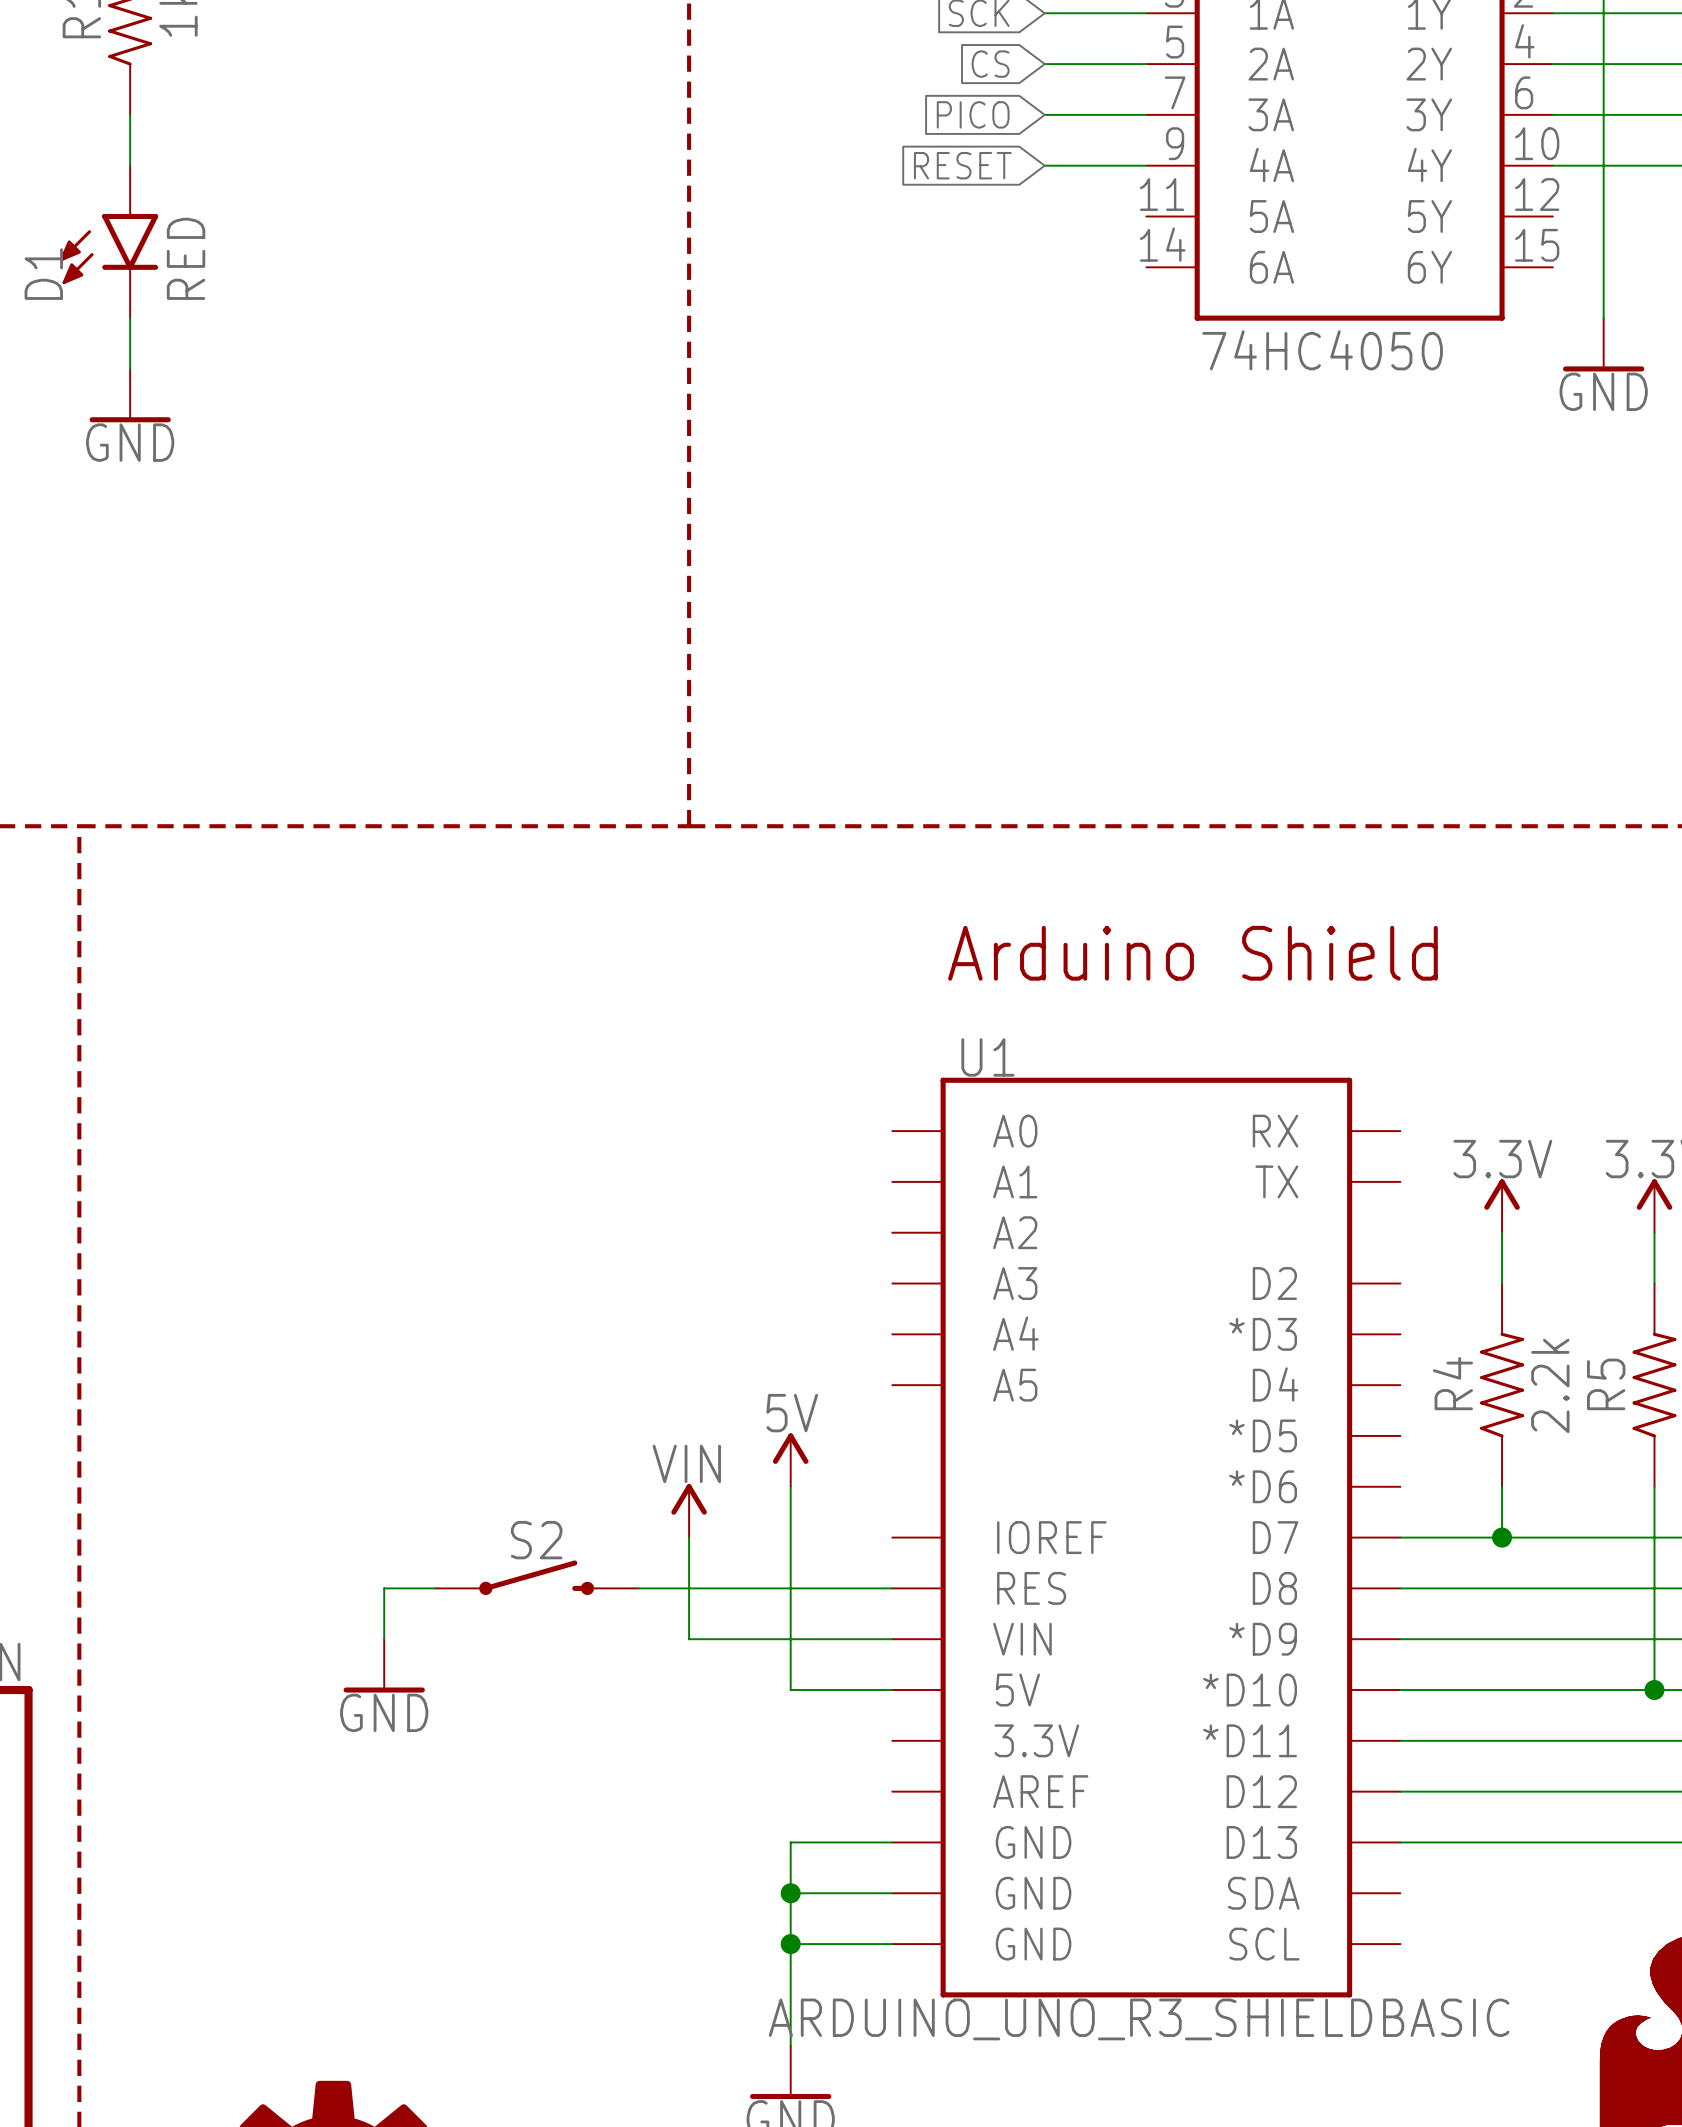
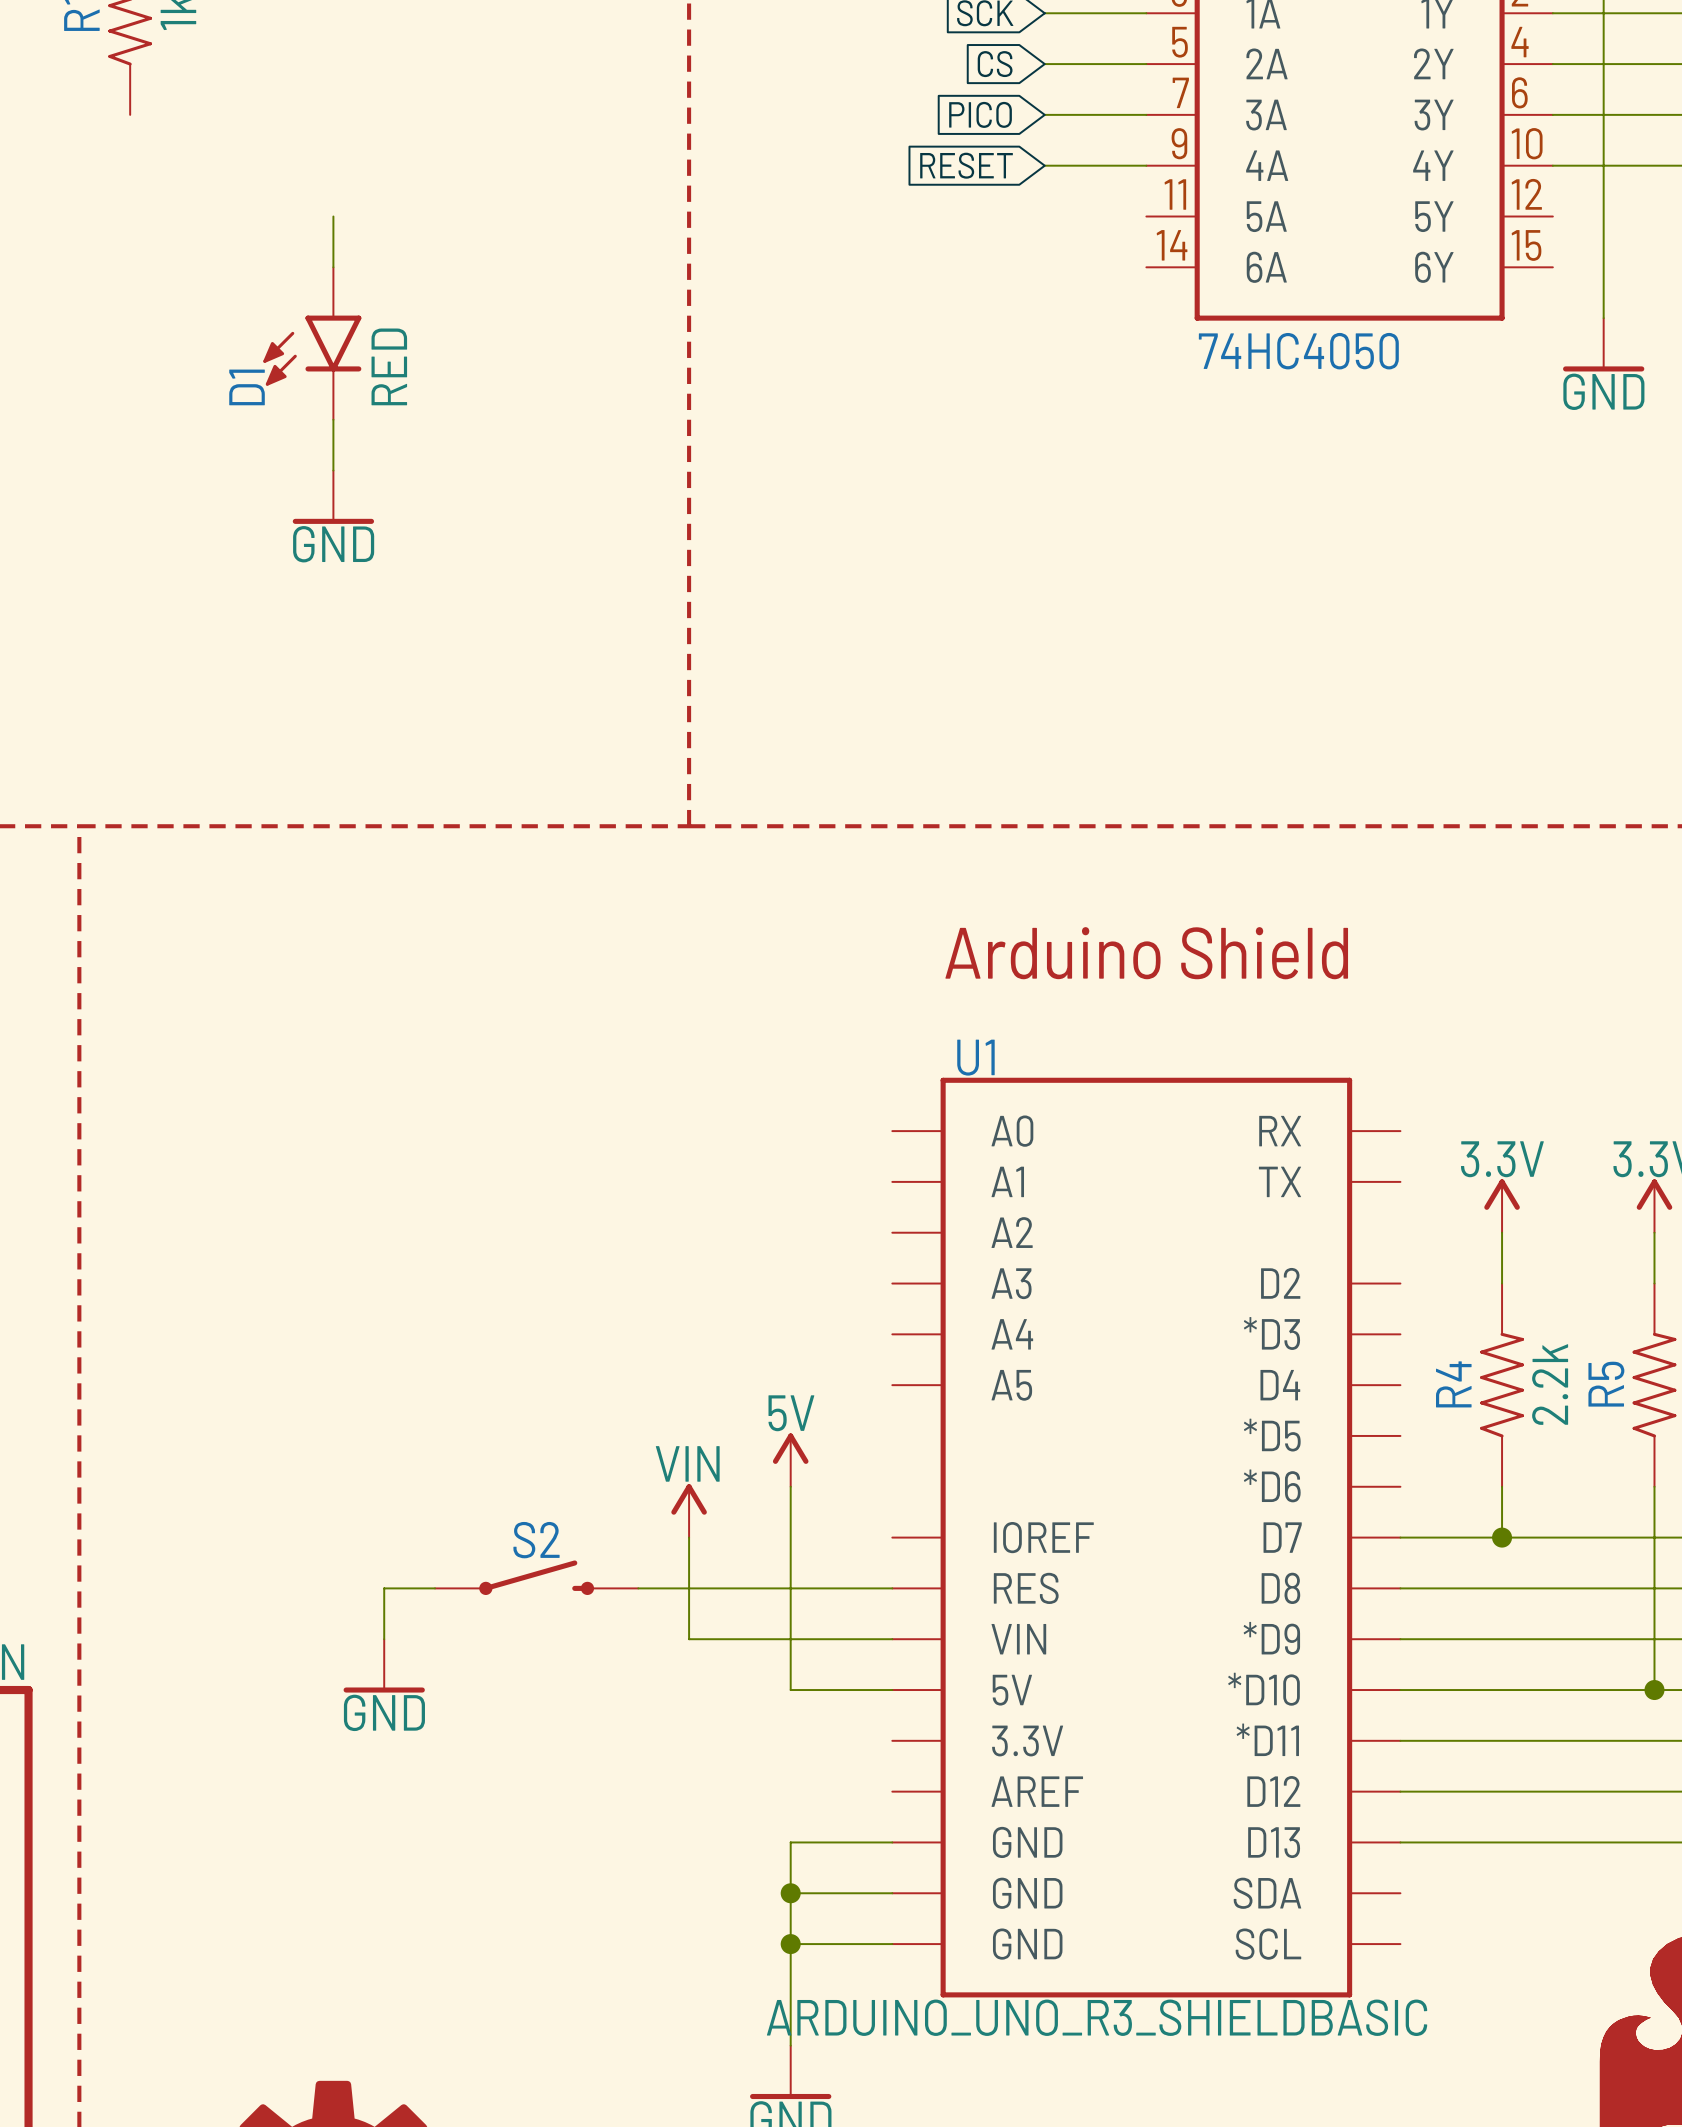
wire: (130, 114) (130, 165) -> (333, 216) (333, 267)
D1 position: (109, 241) -> (312, 343)
wire: (130, 318) (130, 368) -> (333, 419) (333, 470)
power symbol position: GND (130, 395) -> GND (333, 497)

